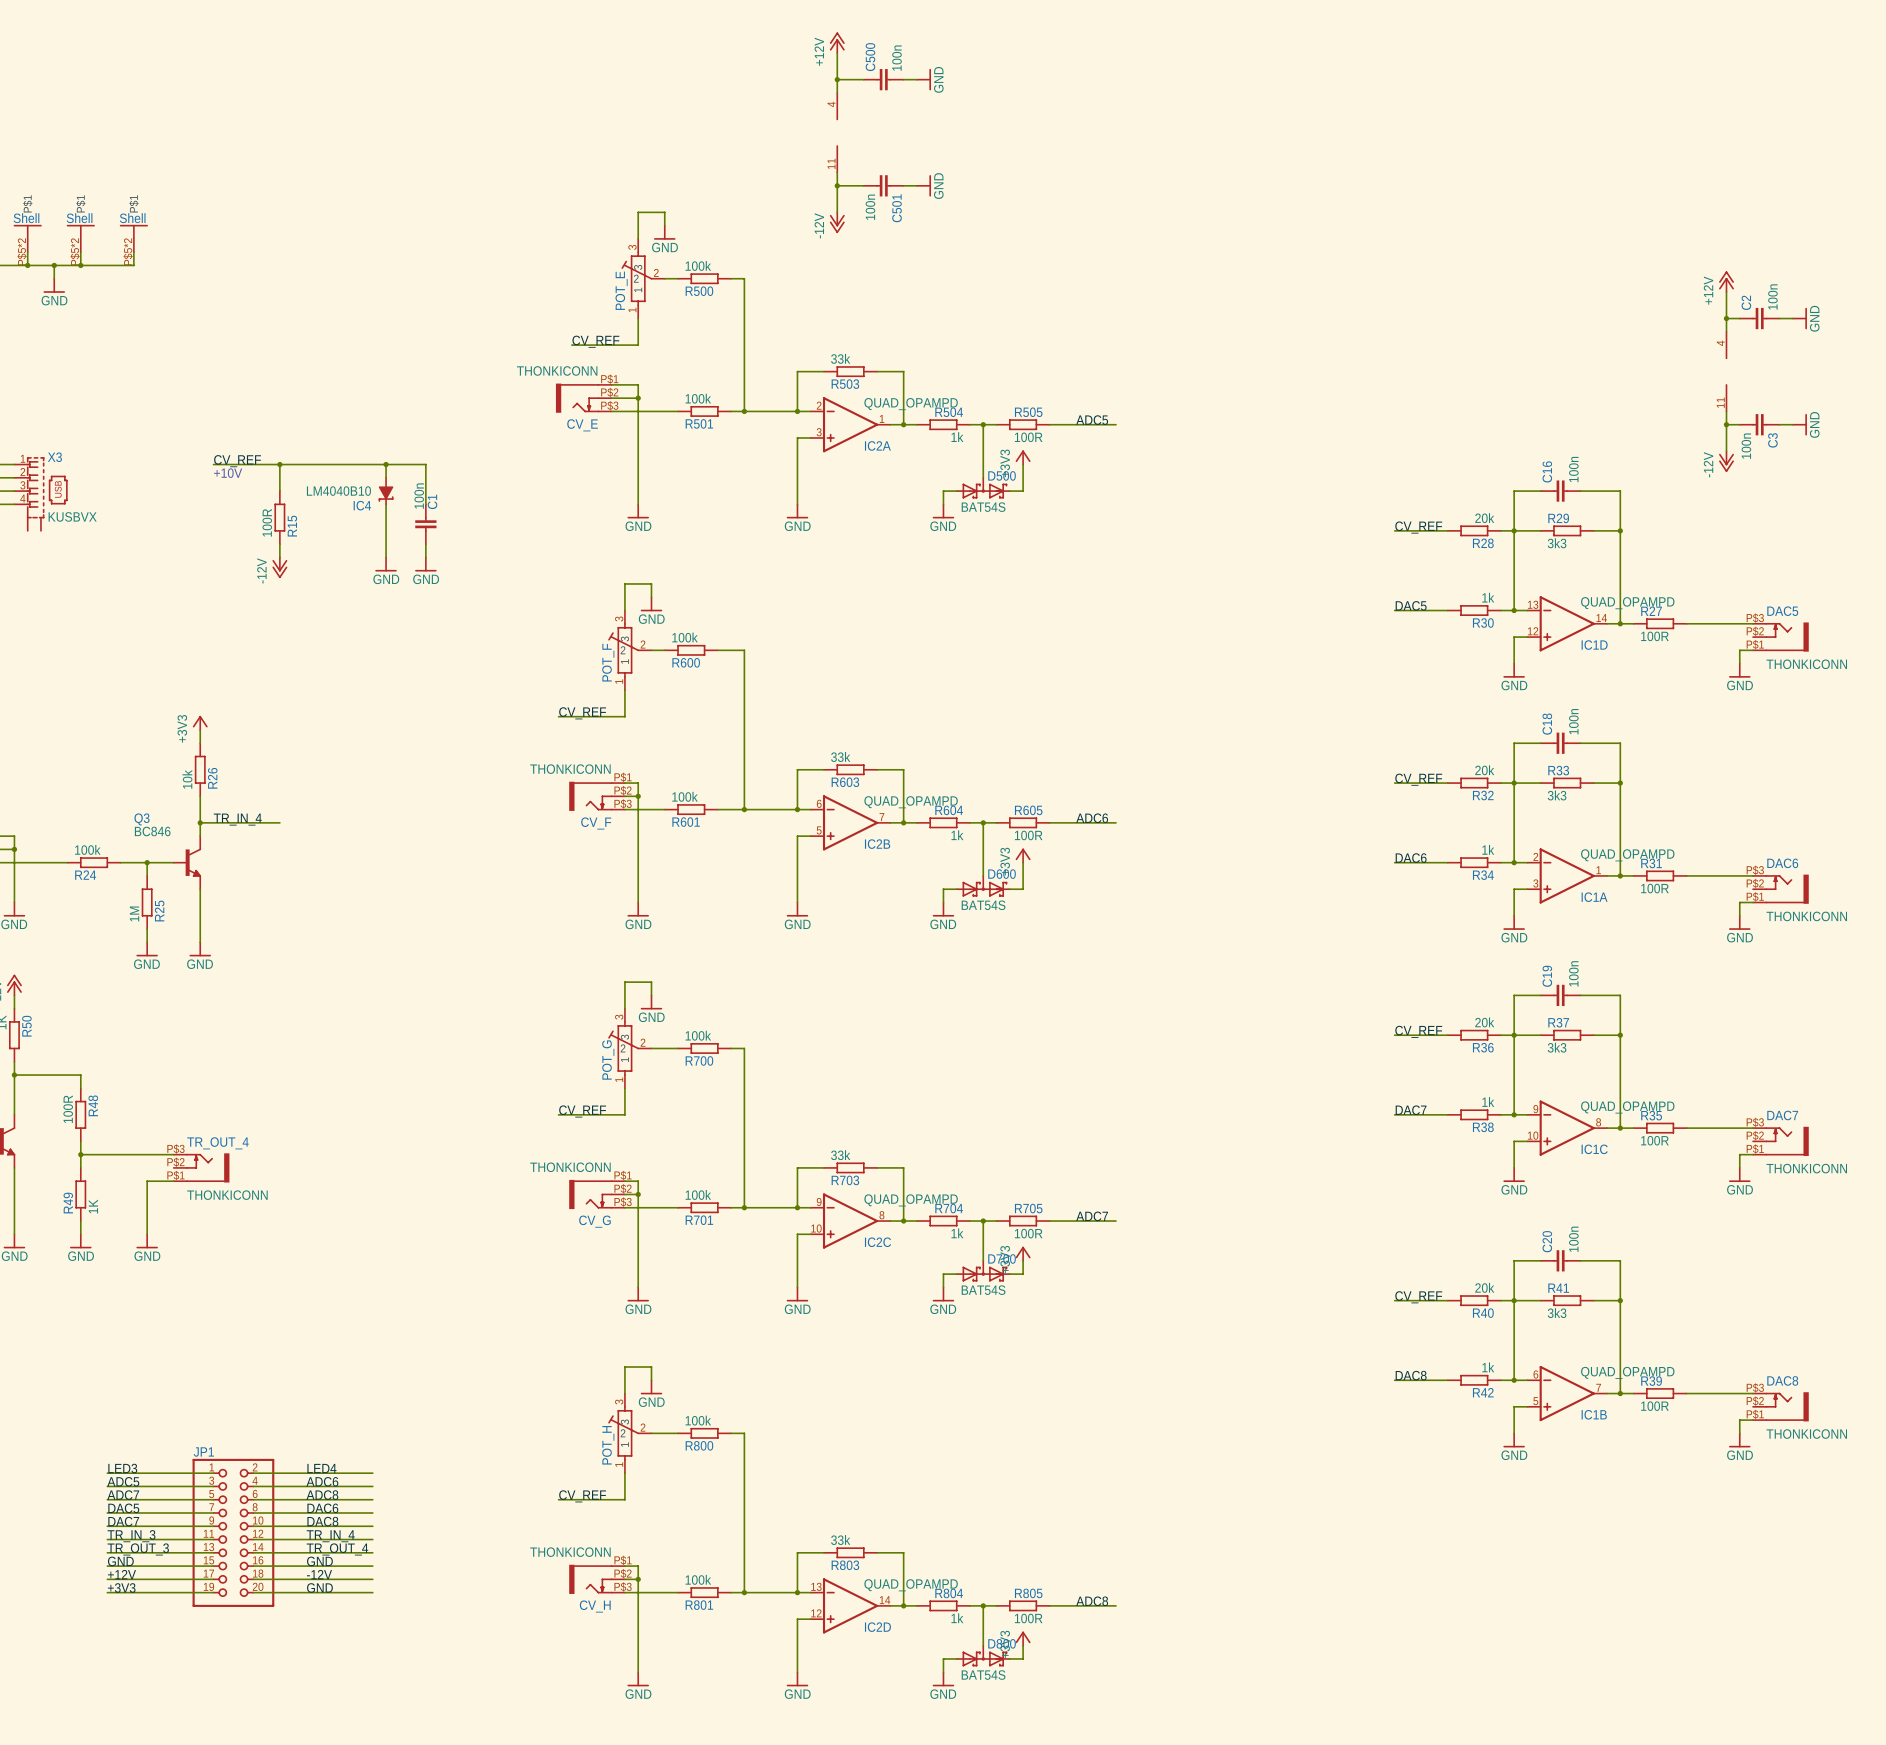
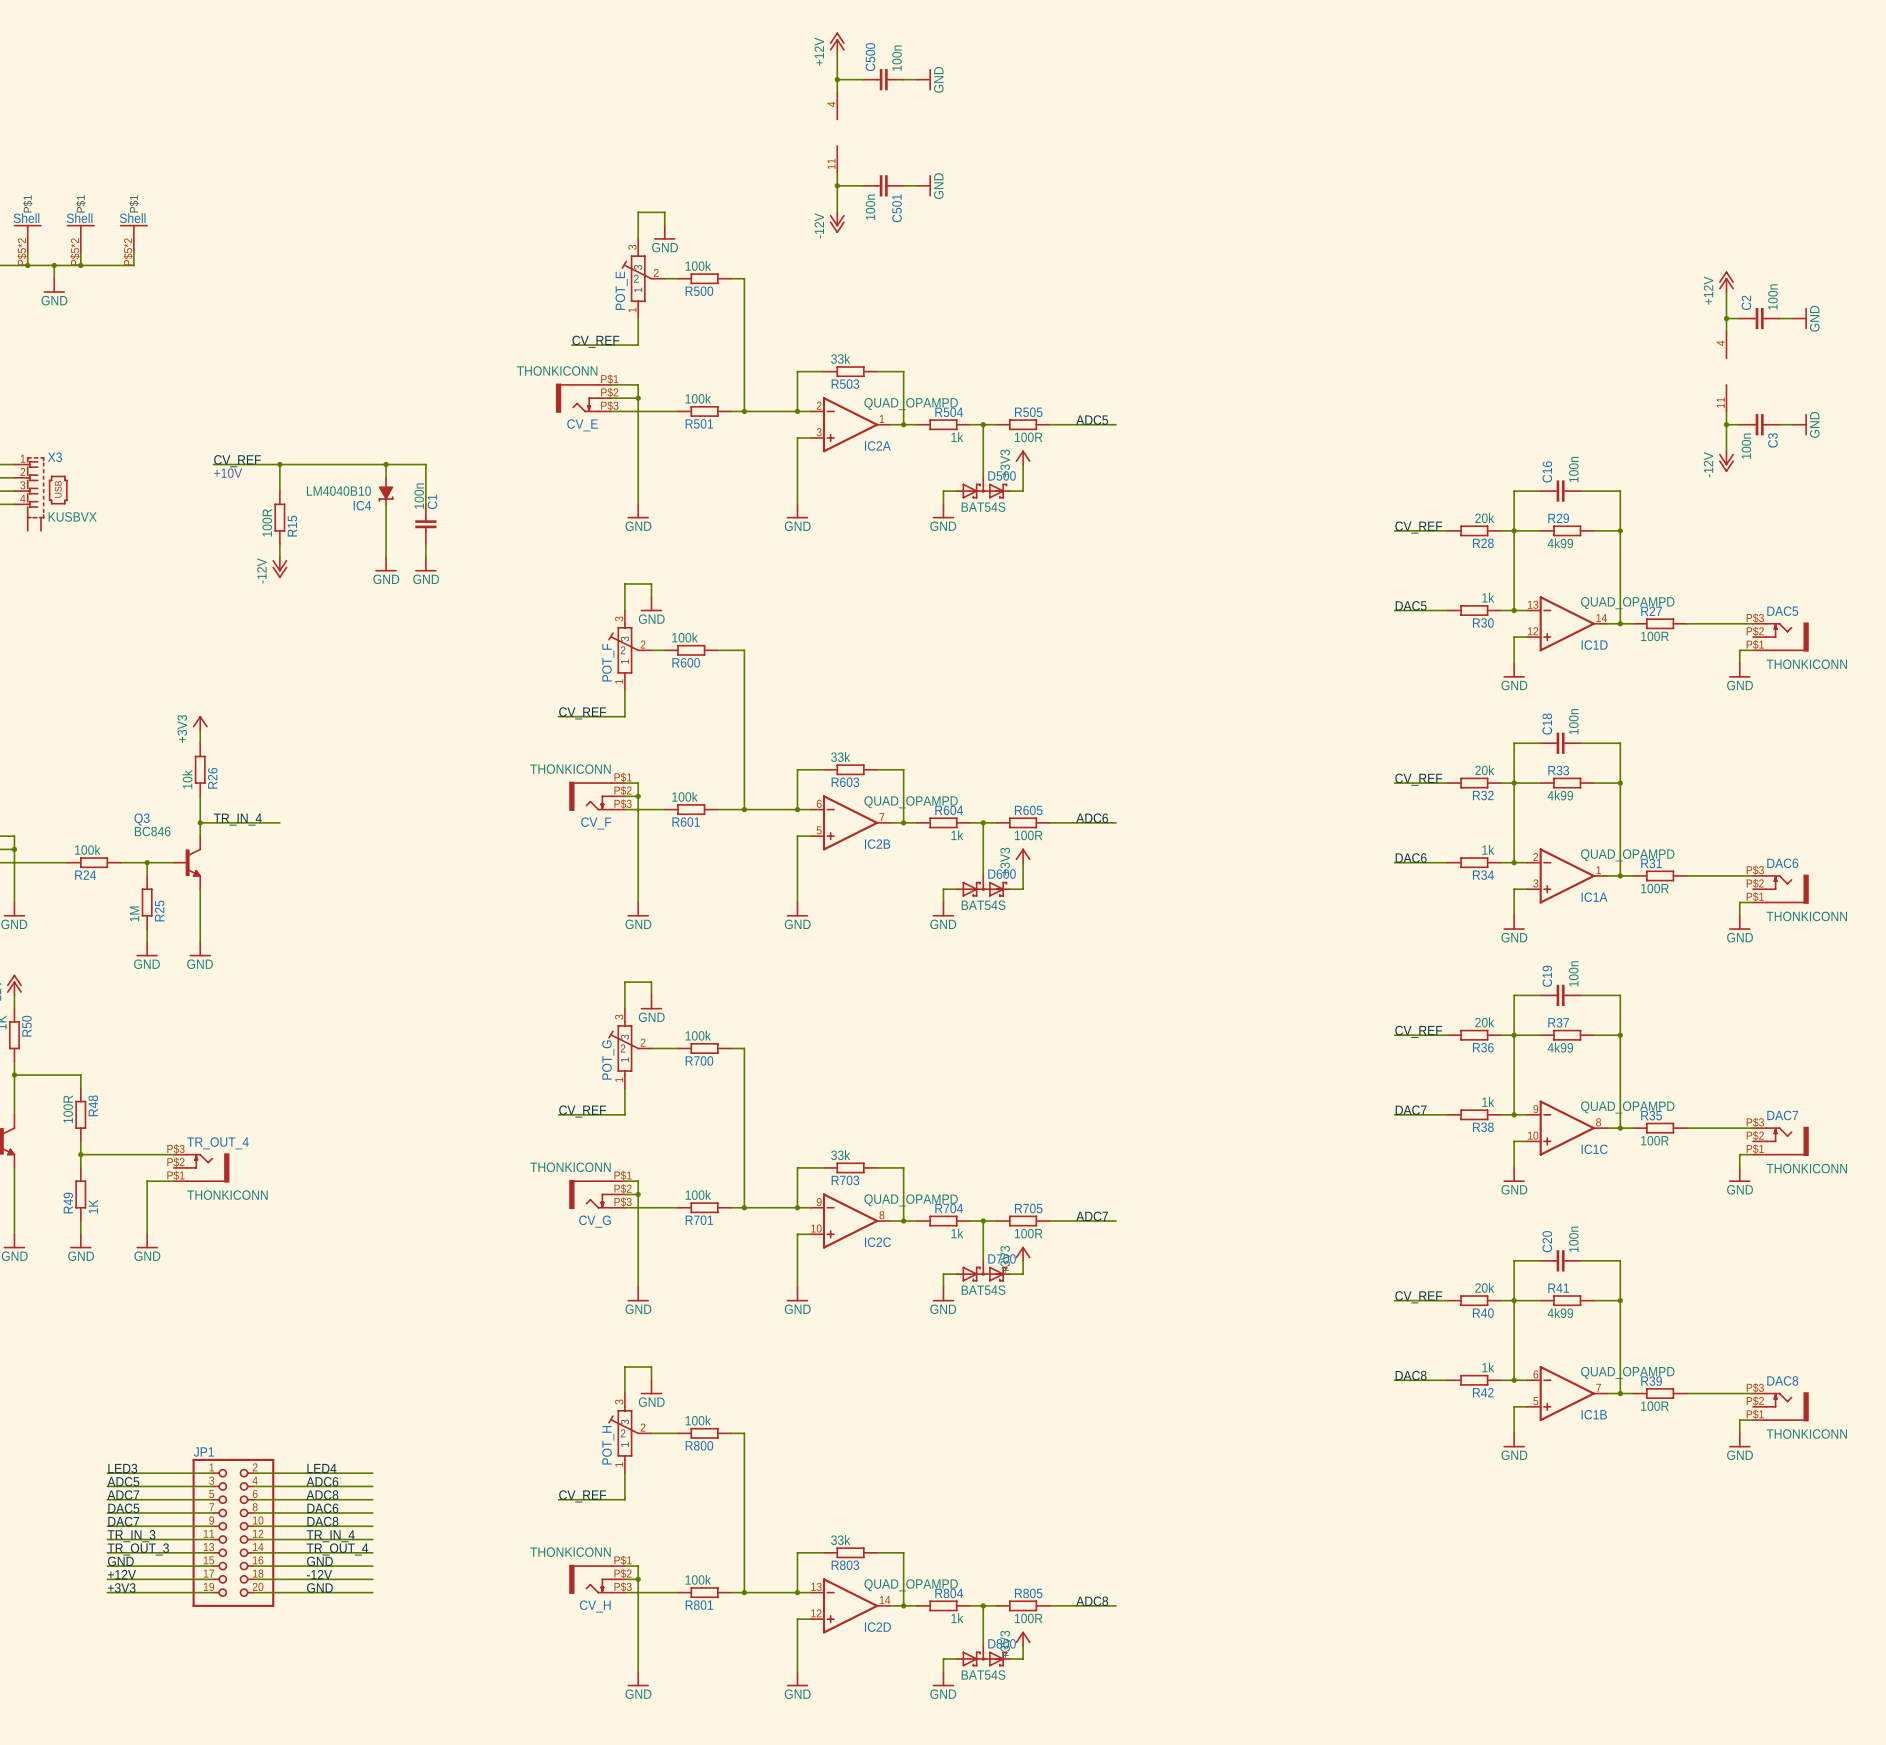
R29 value: 3k3 (1557, 543) -> 4k99 (1560, 543)
R33 value: 3k3 (1557, 795) -> 4k99 (1560, 795)
R37 value: 3k3 (1557, 1047) -> 4k99 (1560, 1047)
R41 value: 3k3 (1557, 1313) -> 4k99 (1560, 1313)

